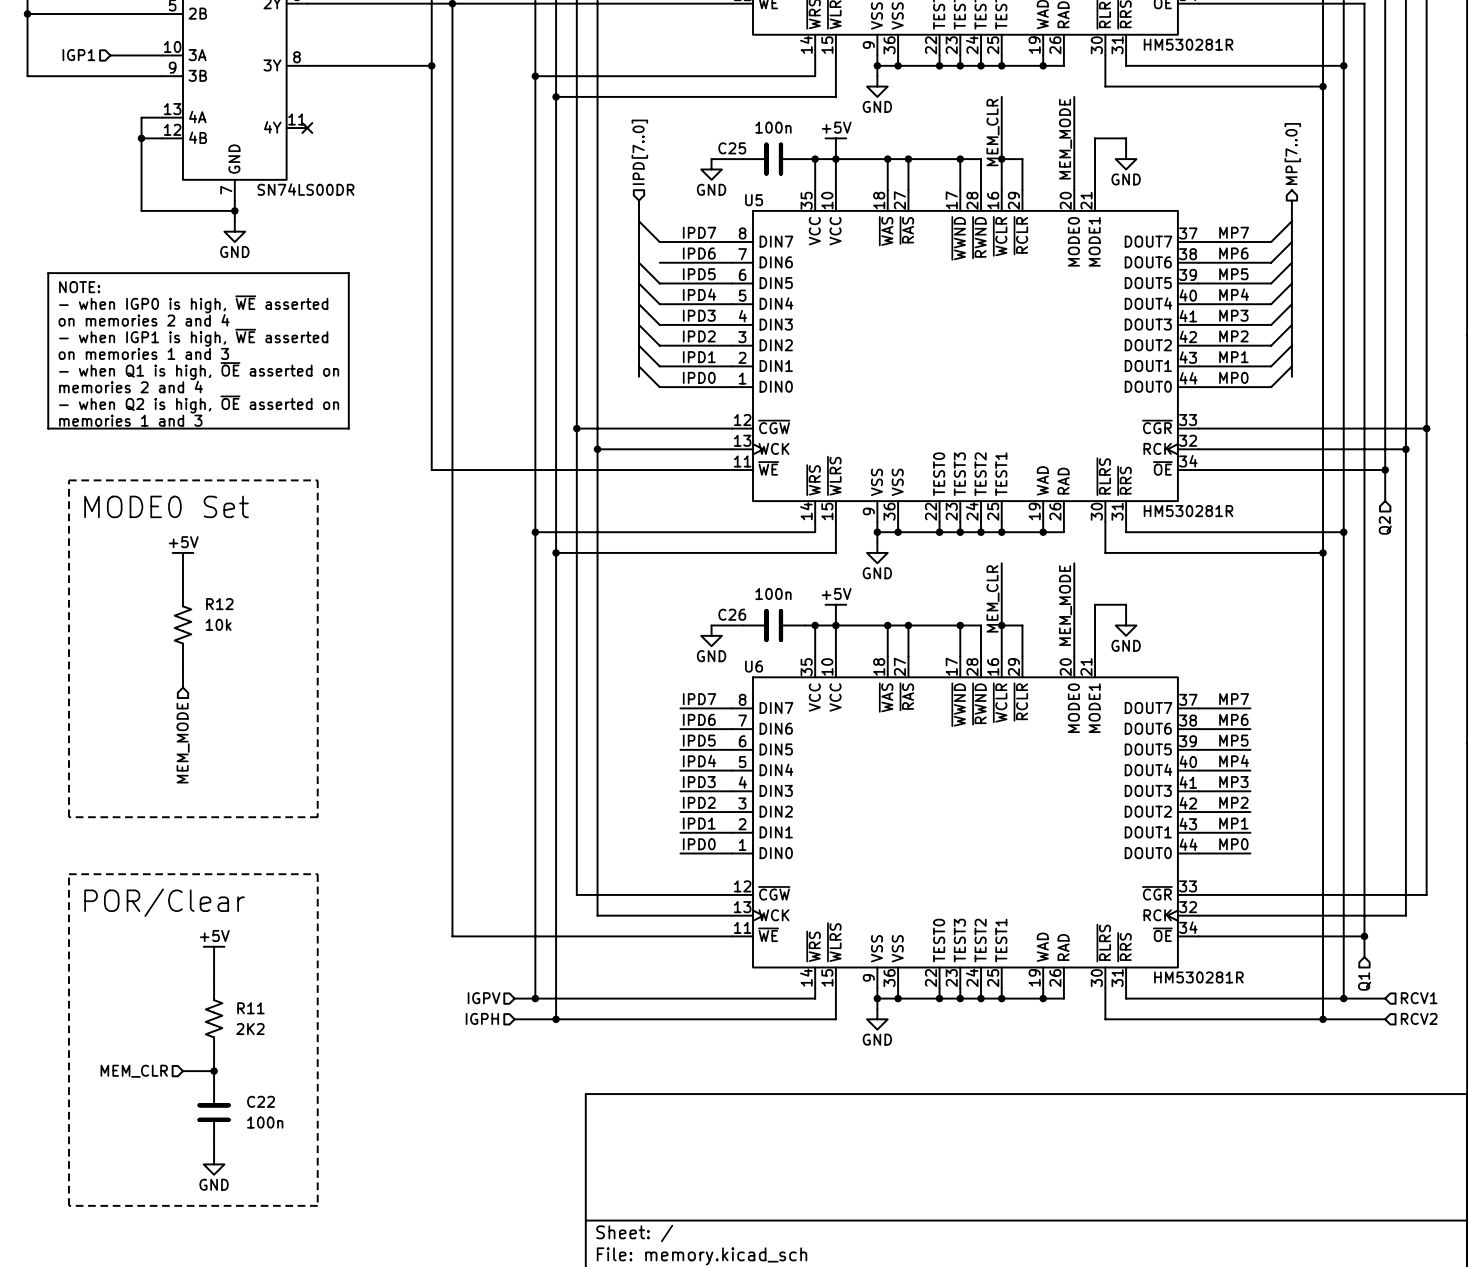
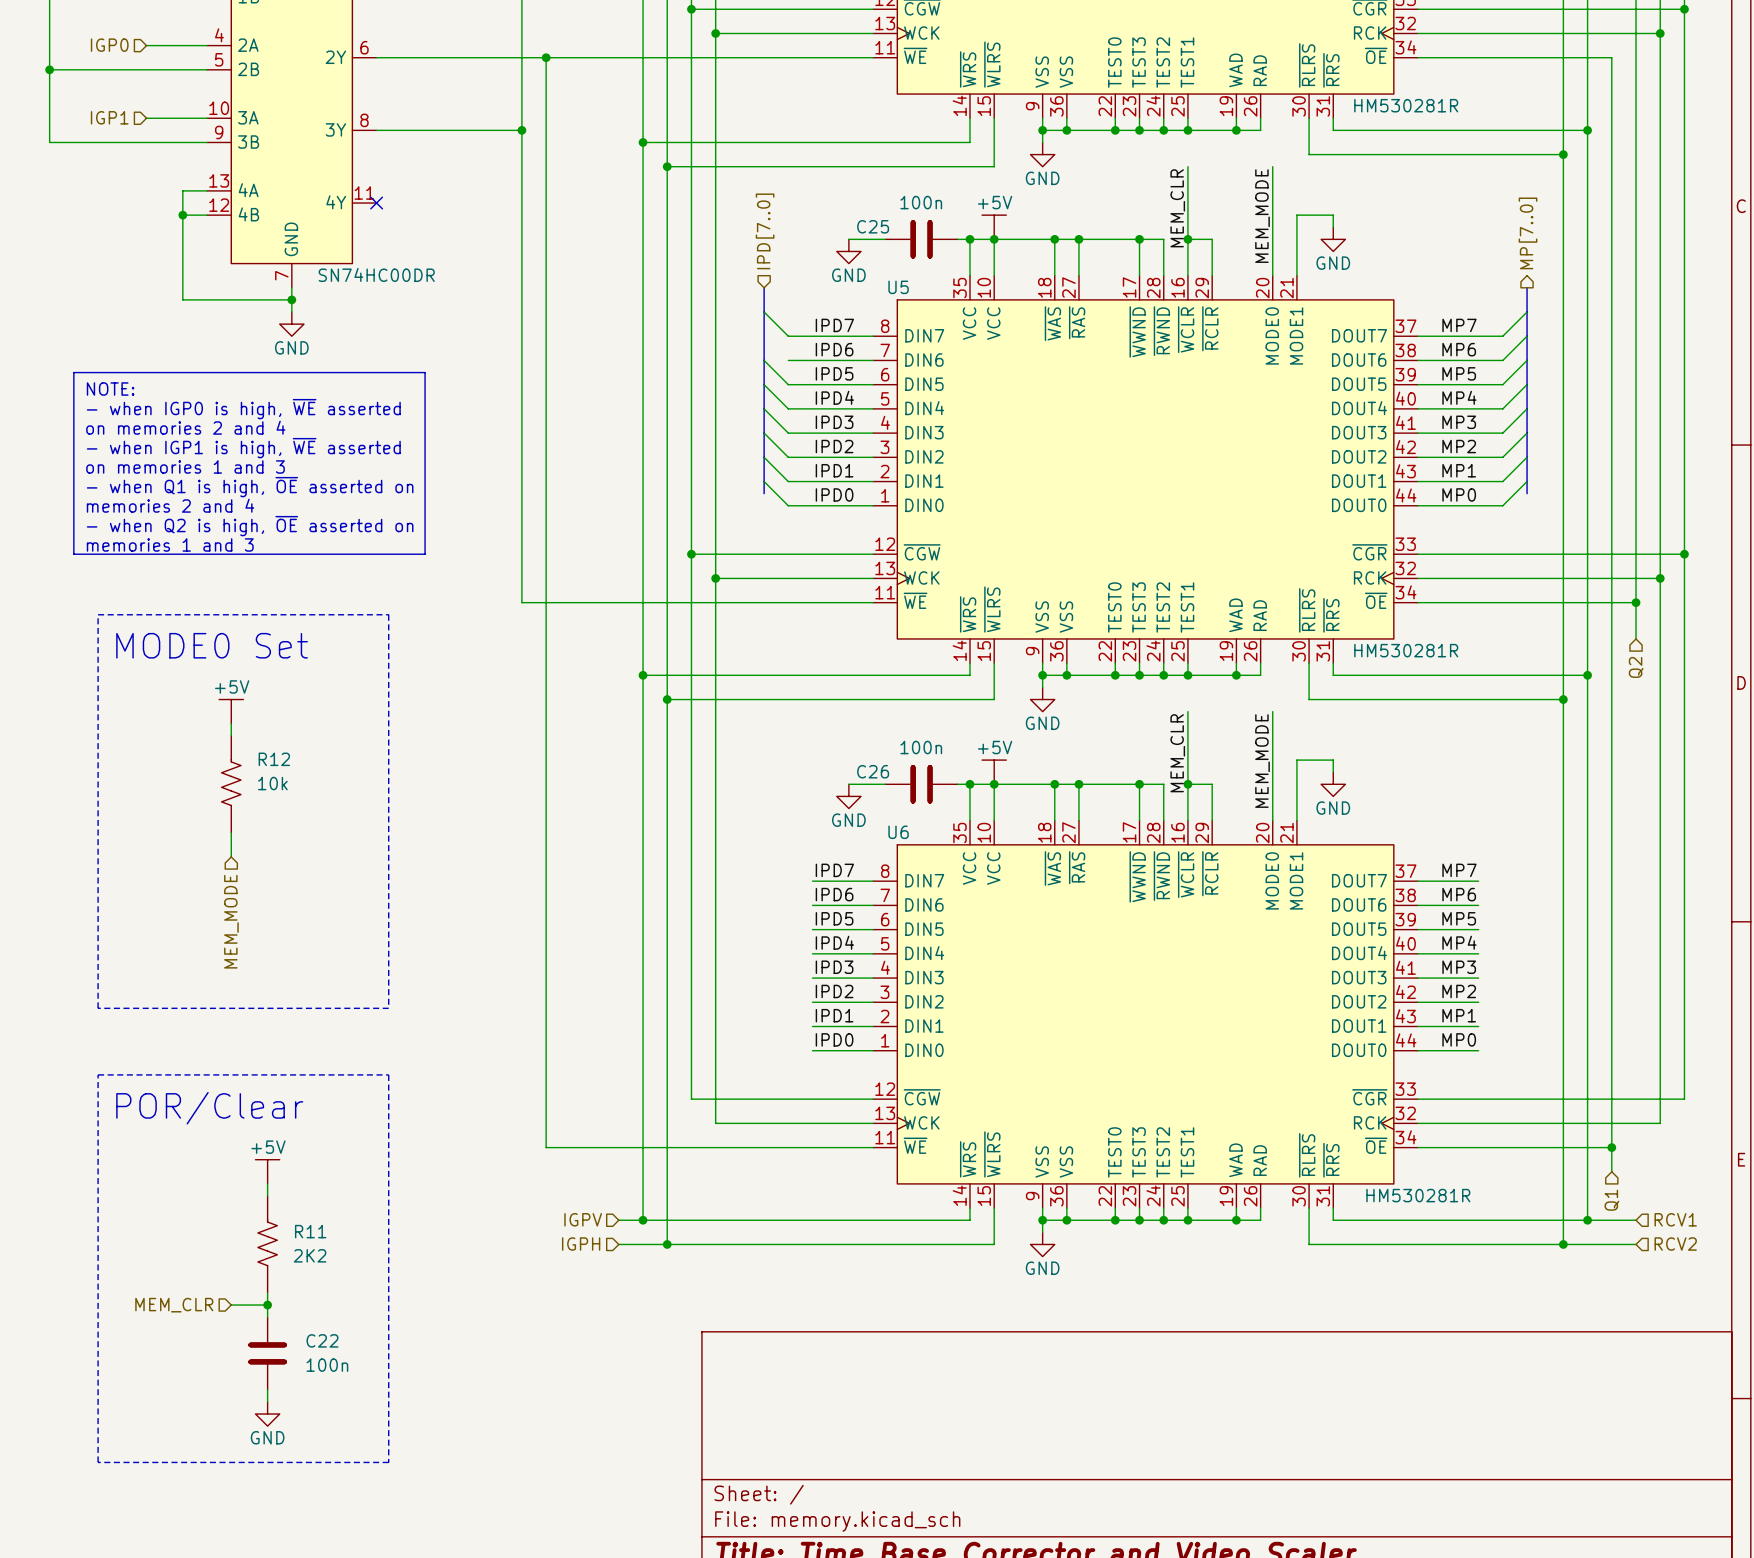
part value: SN74LS00DR (305, 189) -> SN74HC00DR (376, 274)

